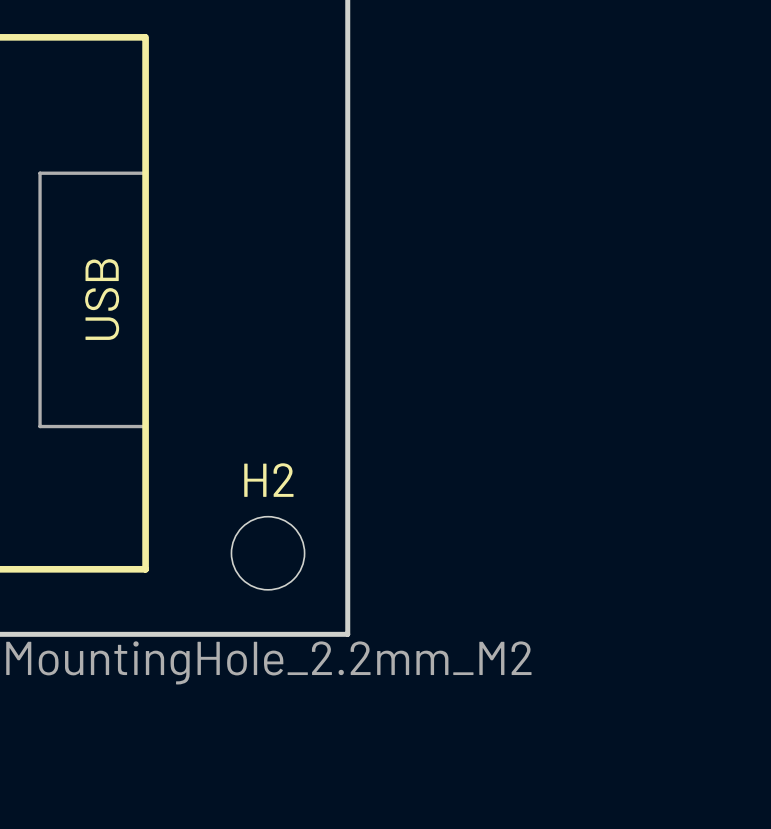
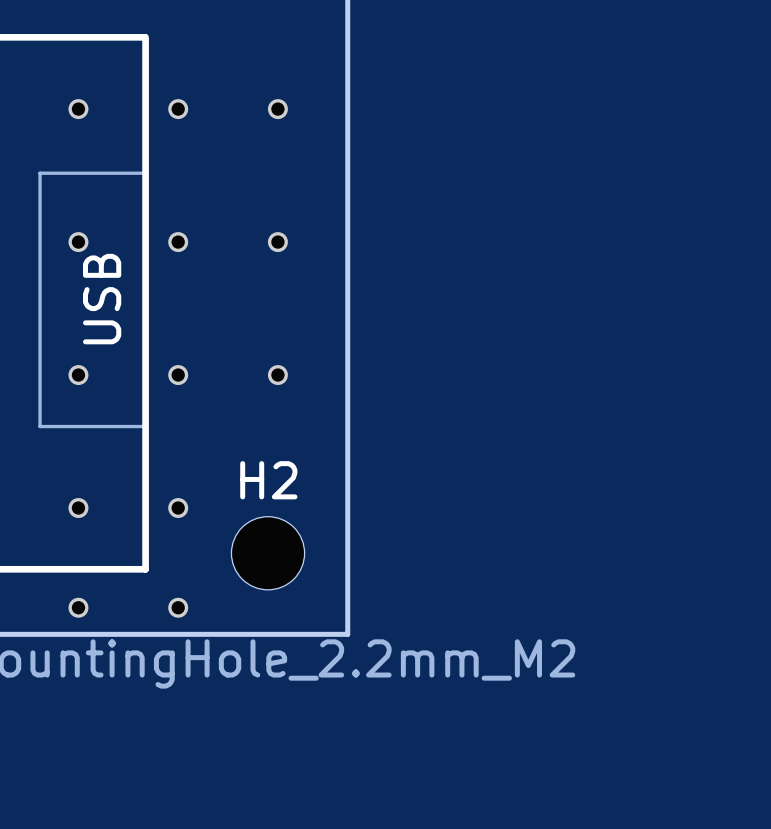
part: none -> (78, 109)
part: none -> (178, 109)
part: none -> (277, 109)
part: none -> (78, 242)
part: none -> (178, 242)
part: none -> (277, 242)
part: none -> (78, 375)
part: none -> (178, 375)
part: none -> (277, 375)
part: none -> (78, 508)
part: none -> (178, 508)
part: none -> (78, 607)
part: none -> (178, 607)

